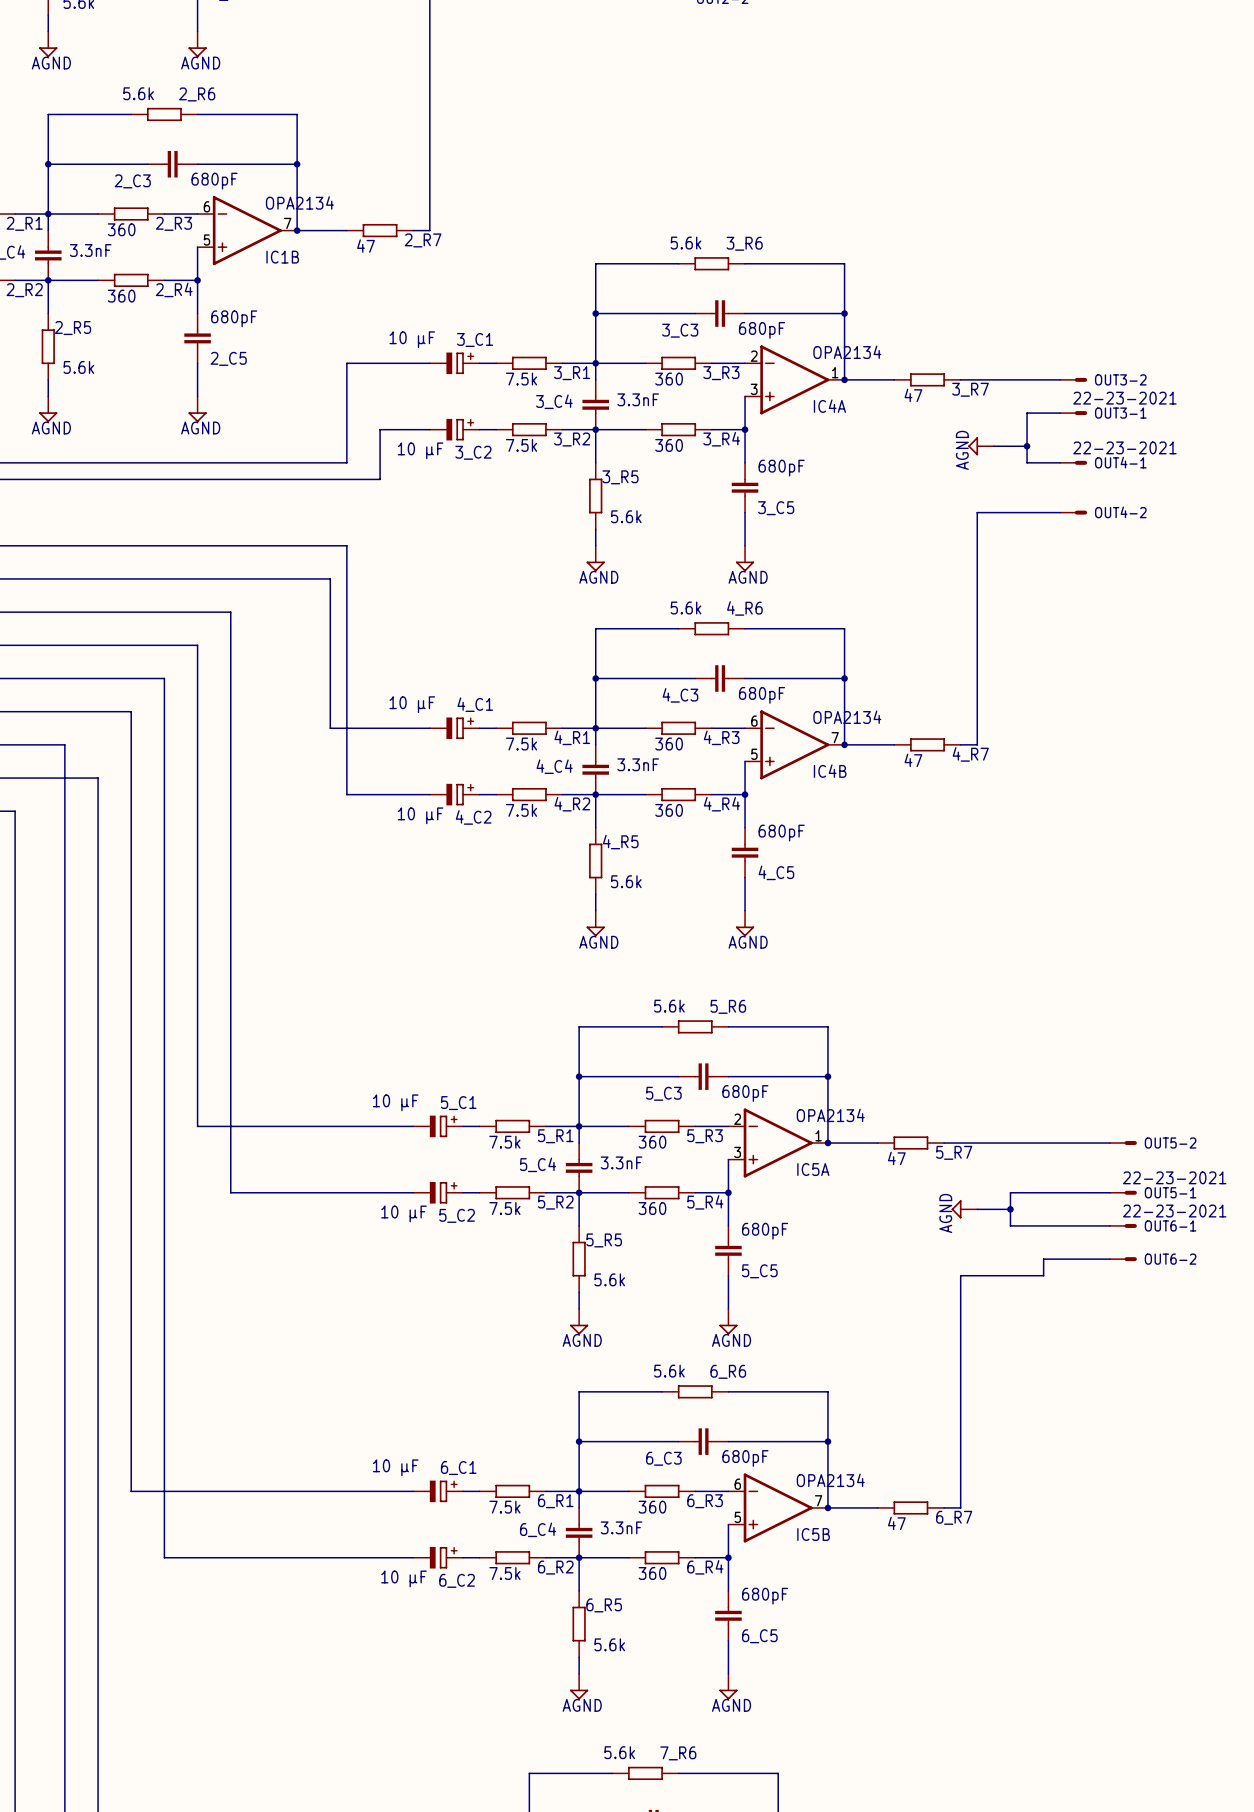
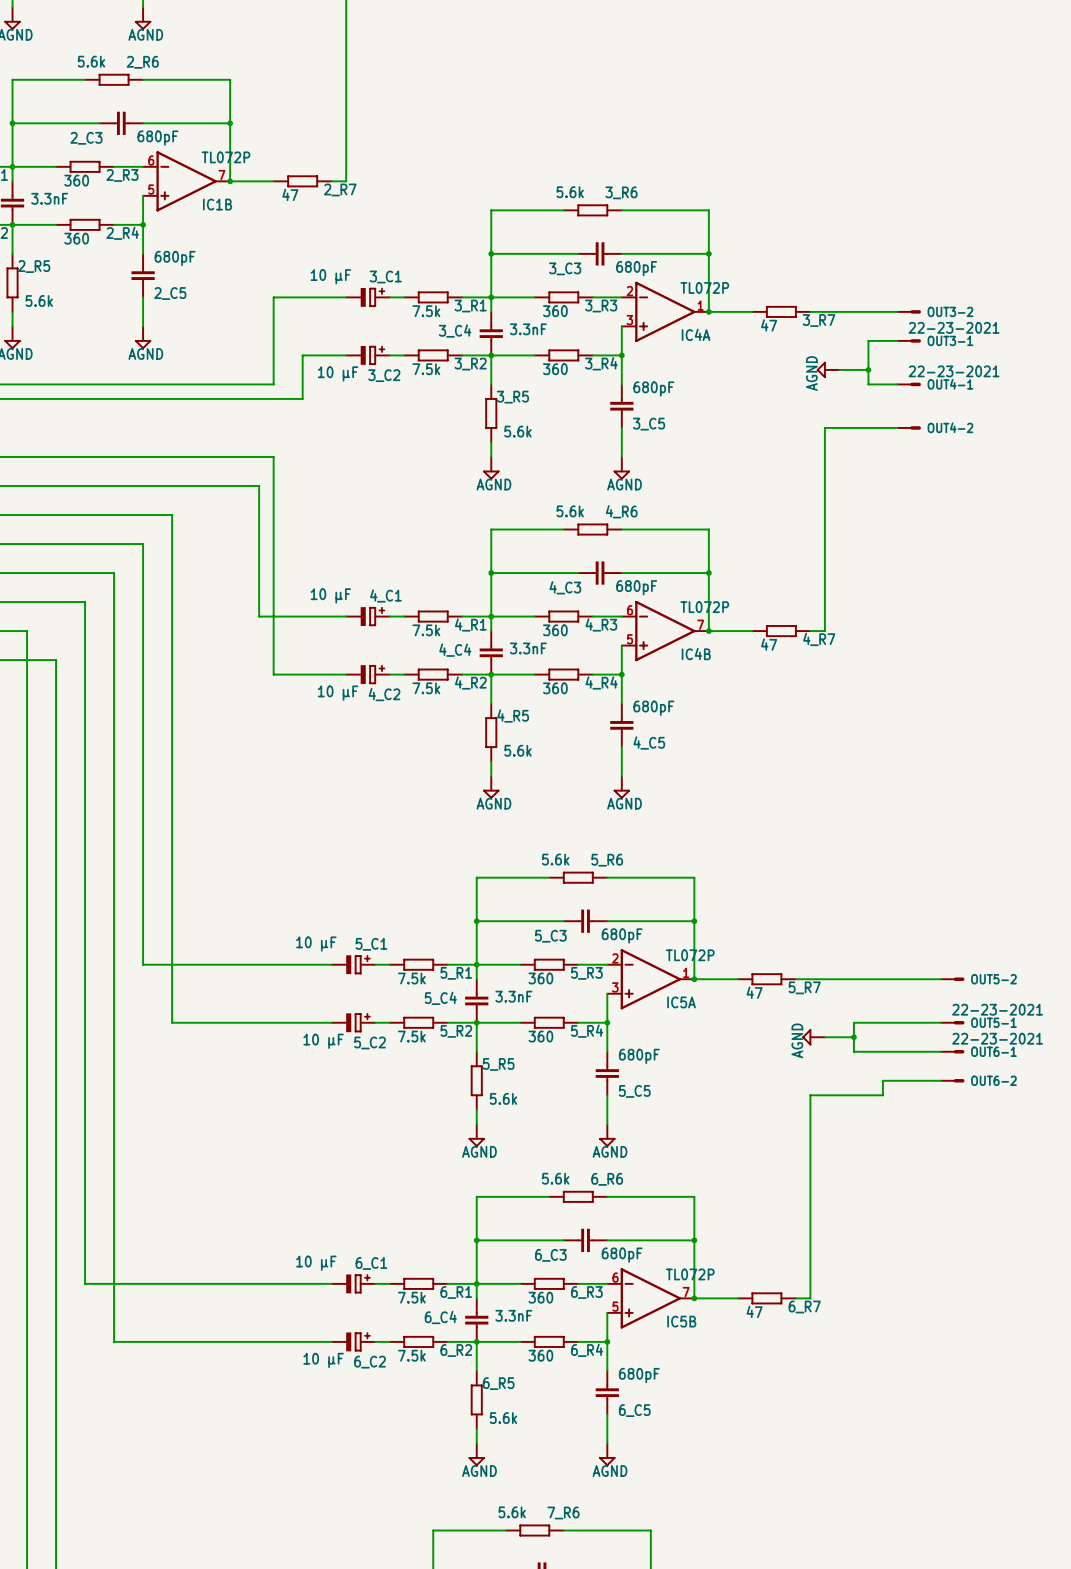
IC1B value: OPA2134 (299, 202) -> TL072P (226, 157)
IC4A value: OPA2134 (847, 352) -> TL072P (704, 287)
IC4B value: OPA2134 (847, 717) -> TL072P (704, 607)
IC5A value: OPA2134 (830, 1115) -> TL072P (690, 955)
IC5B value: OPA2134 (830, 1480) -> TL072P (690, 1274)

